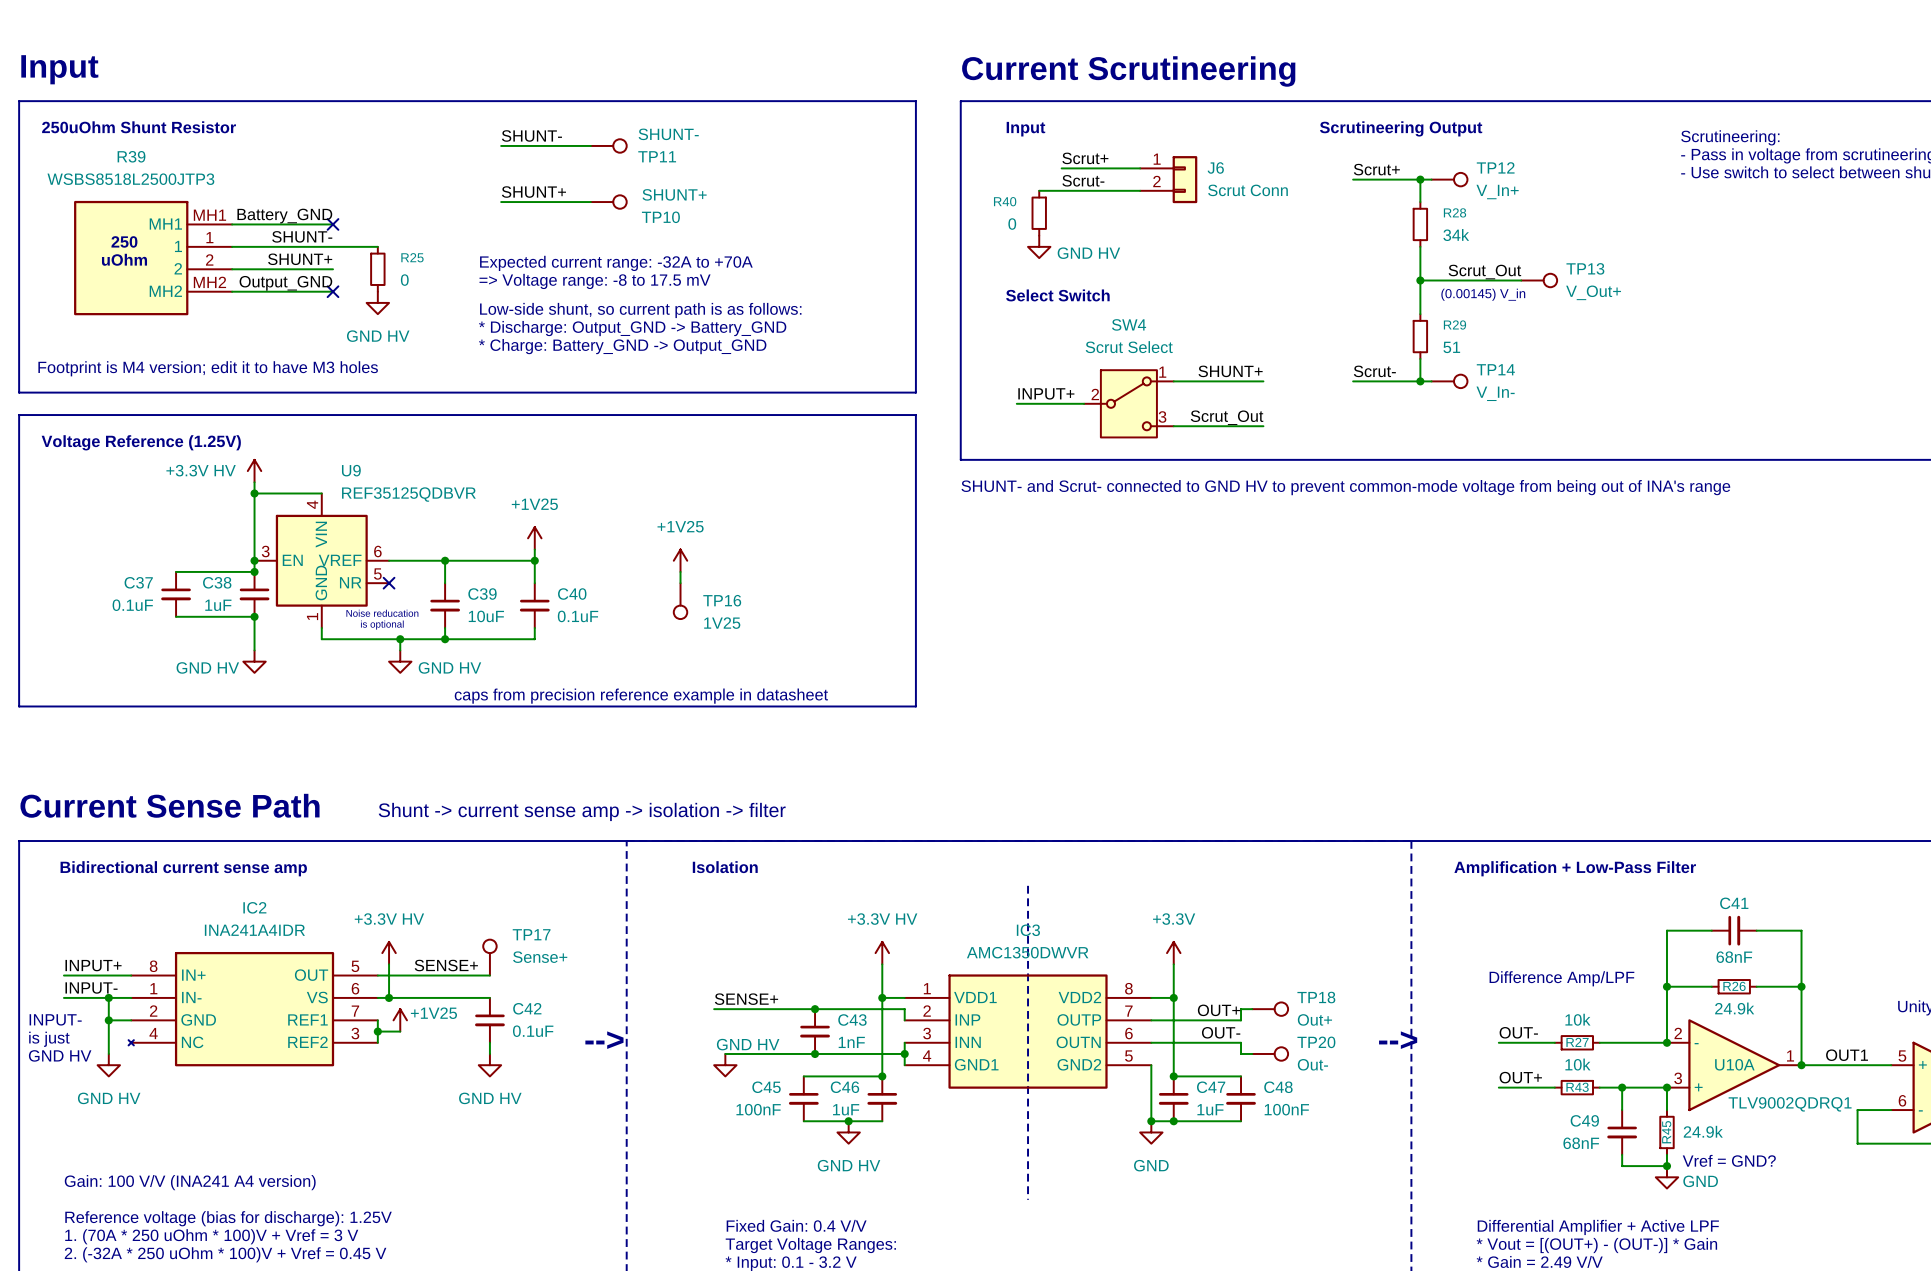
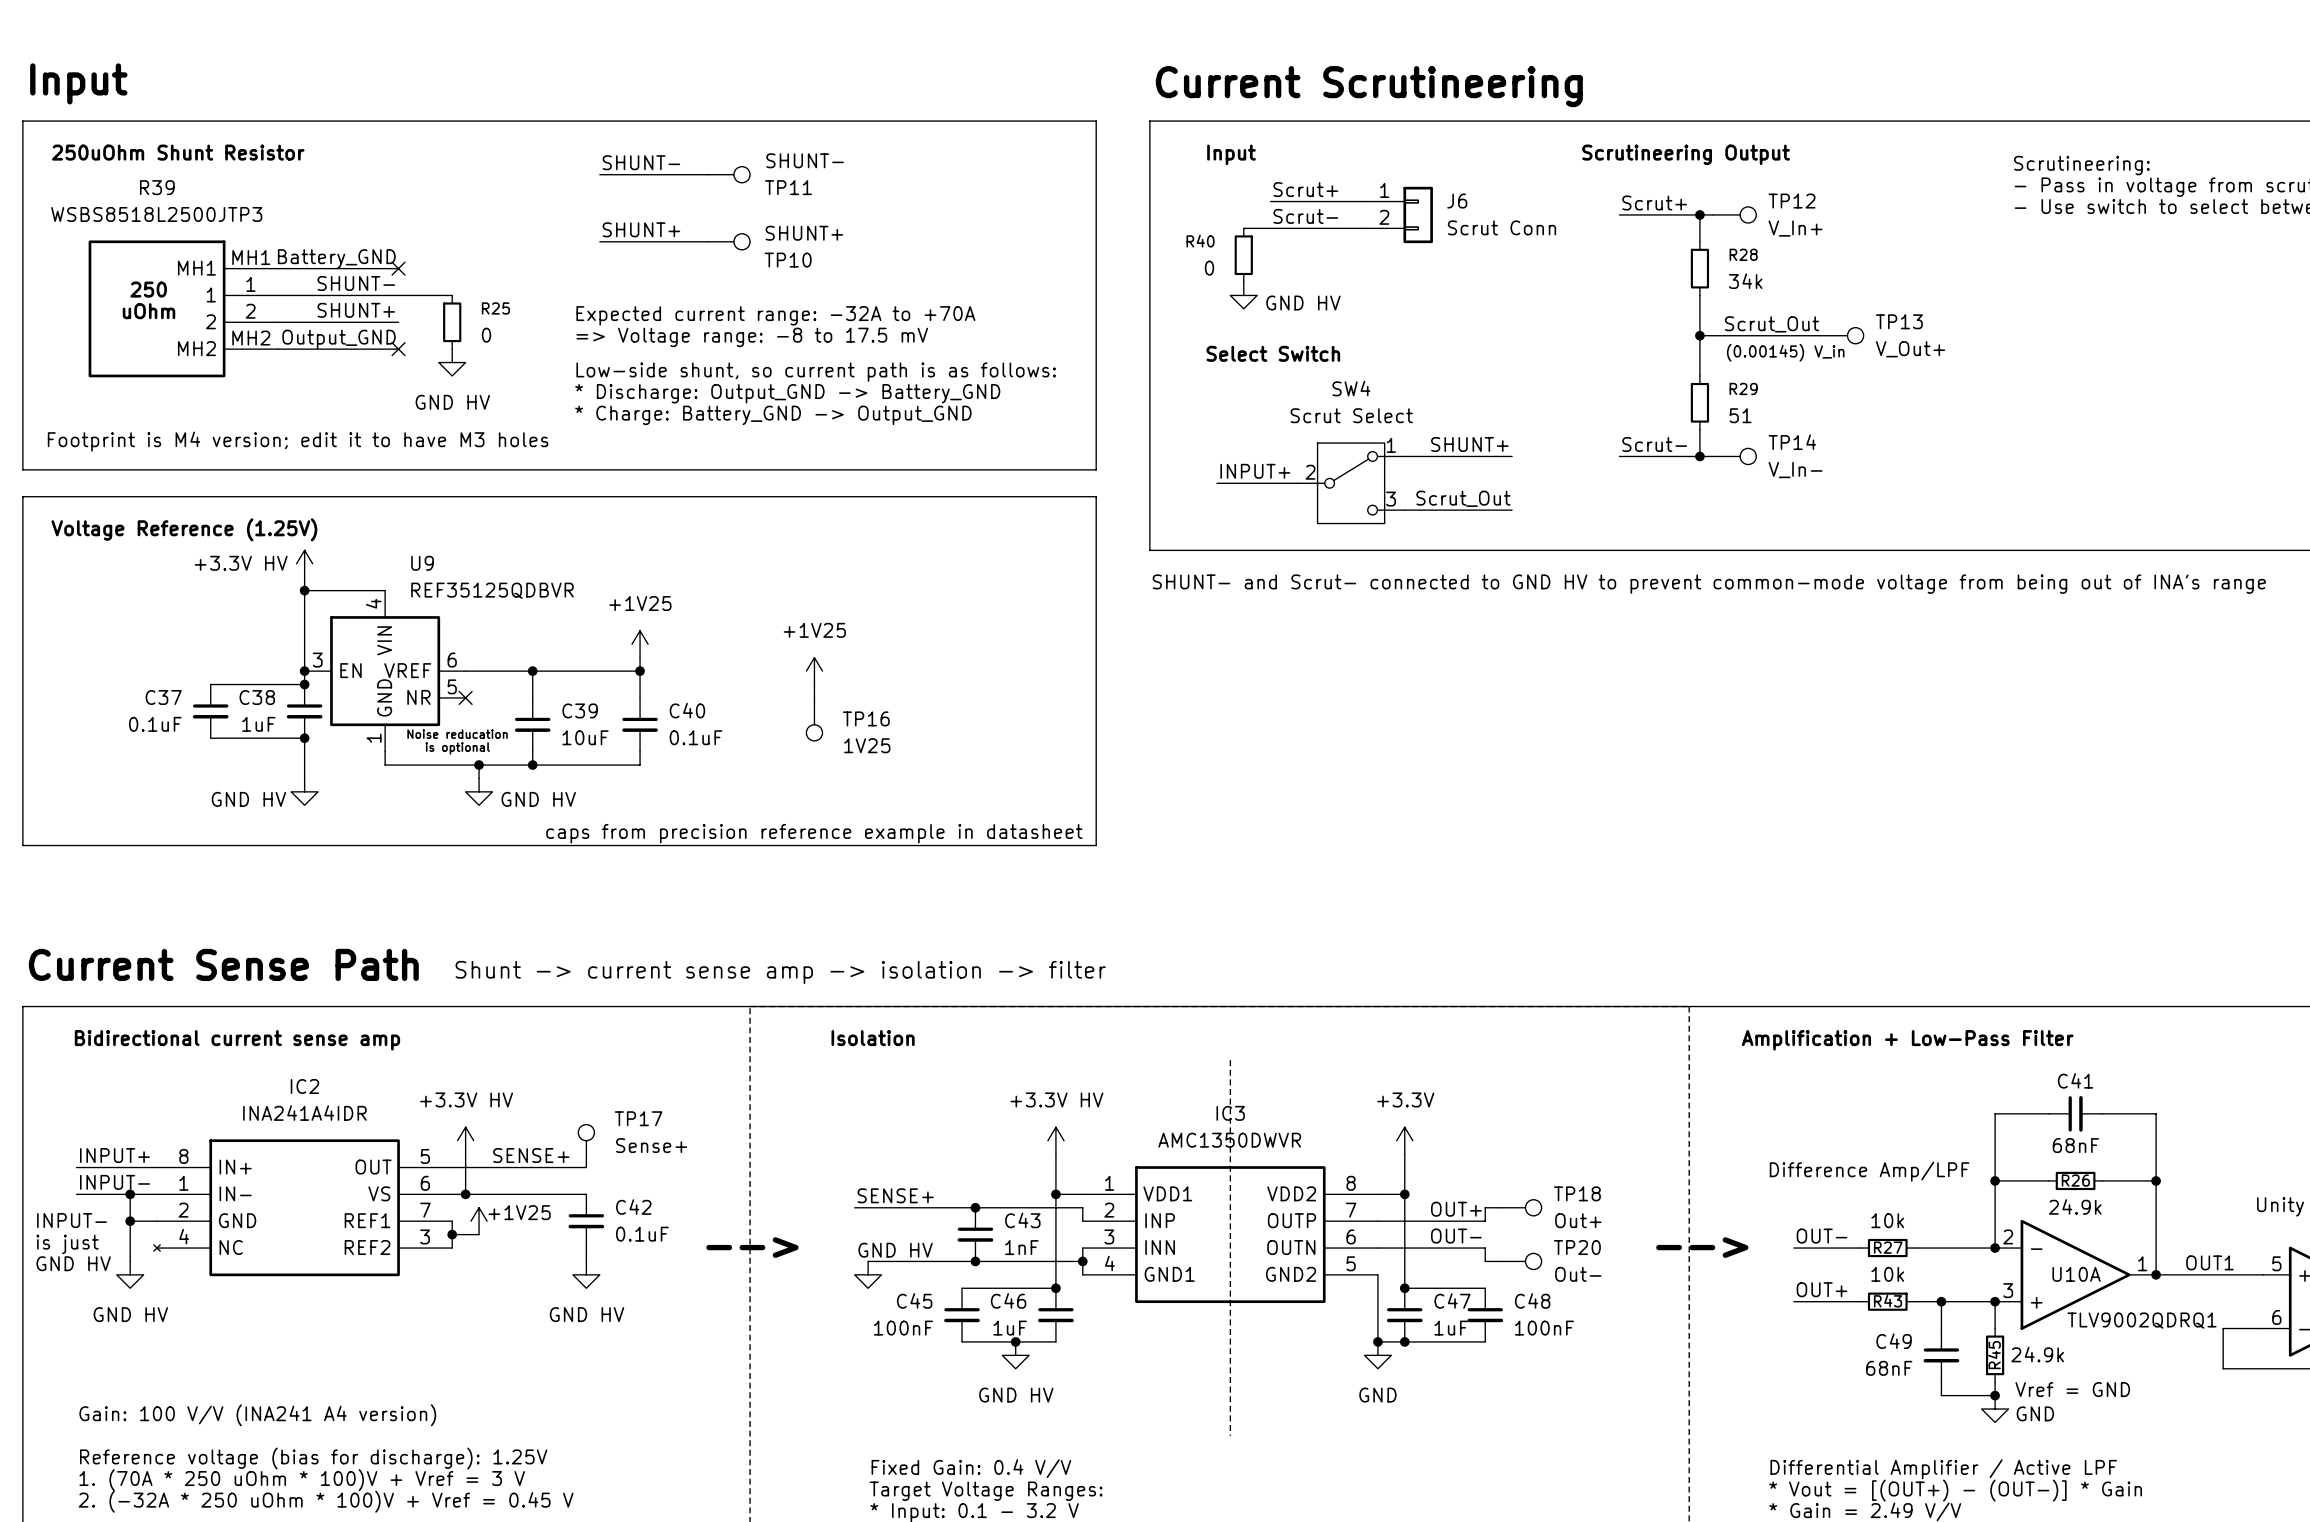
text: Vref = GND? (1729, 1160) -> Vref = GND (2072, 1389)
text: Differential Amplifier + Active LPF (1598, 1227) -> Differential Amplifier / Active LPF (1943, 1469)

